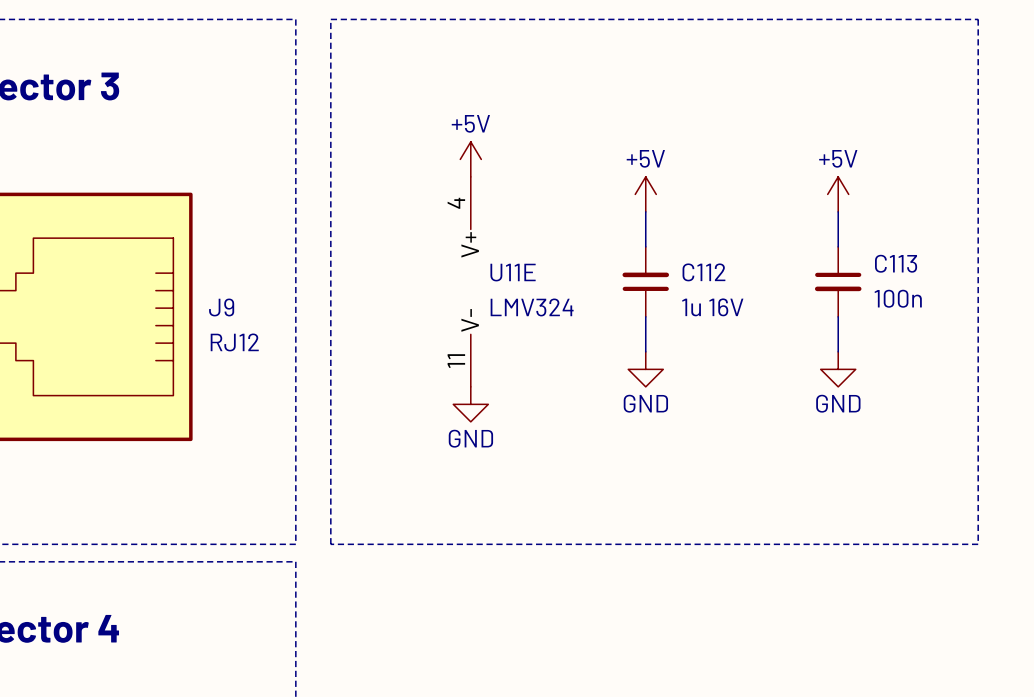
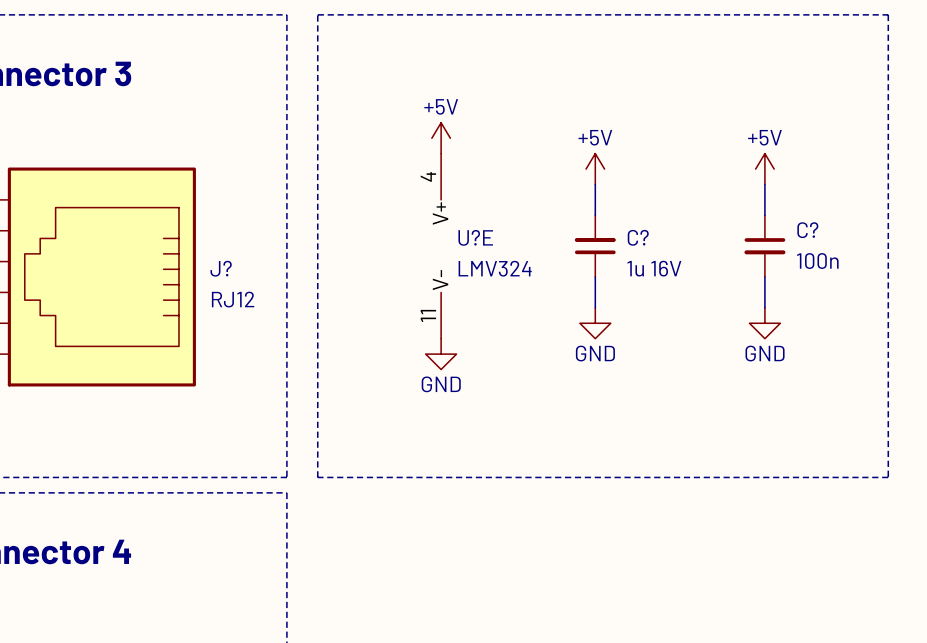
C113 name: C113 (896, 263) -> C? (807, 230)
U11E name: U11E (513, 272) -> U?E (475, 237)
C112 name: C112 (703, 272) -> C? (638, 237)
J9 name: J9 (221, 307) -> J? (221, 268)

